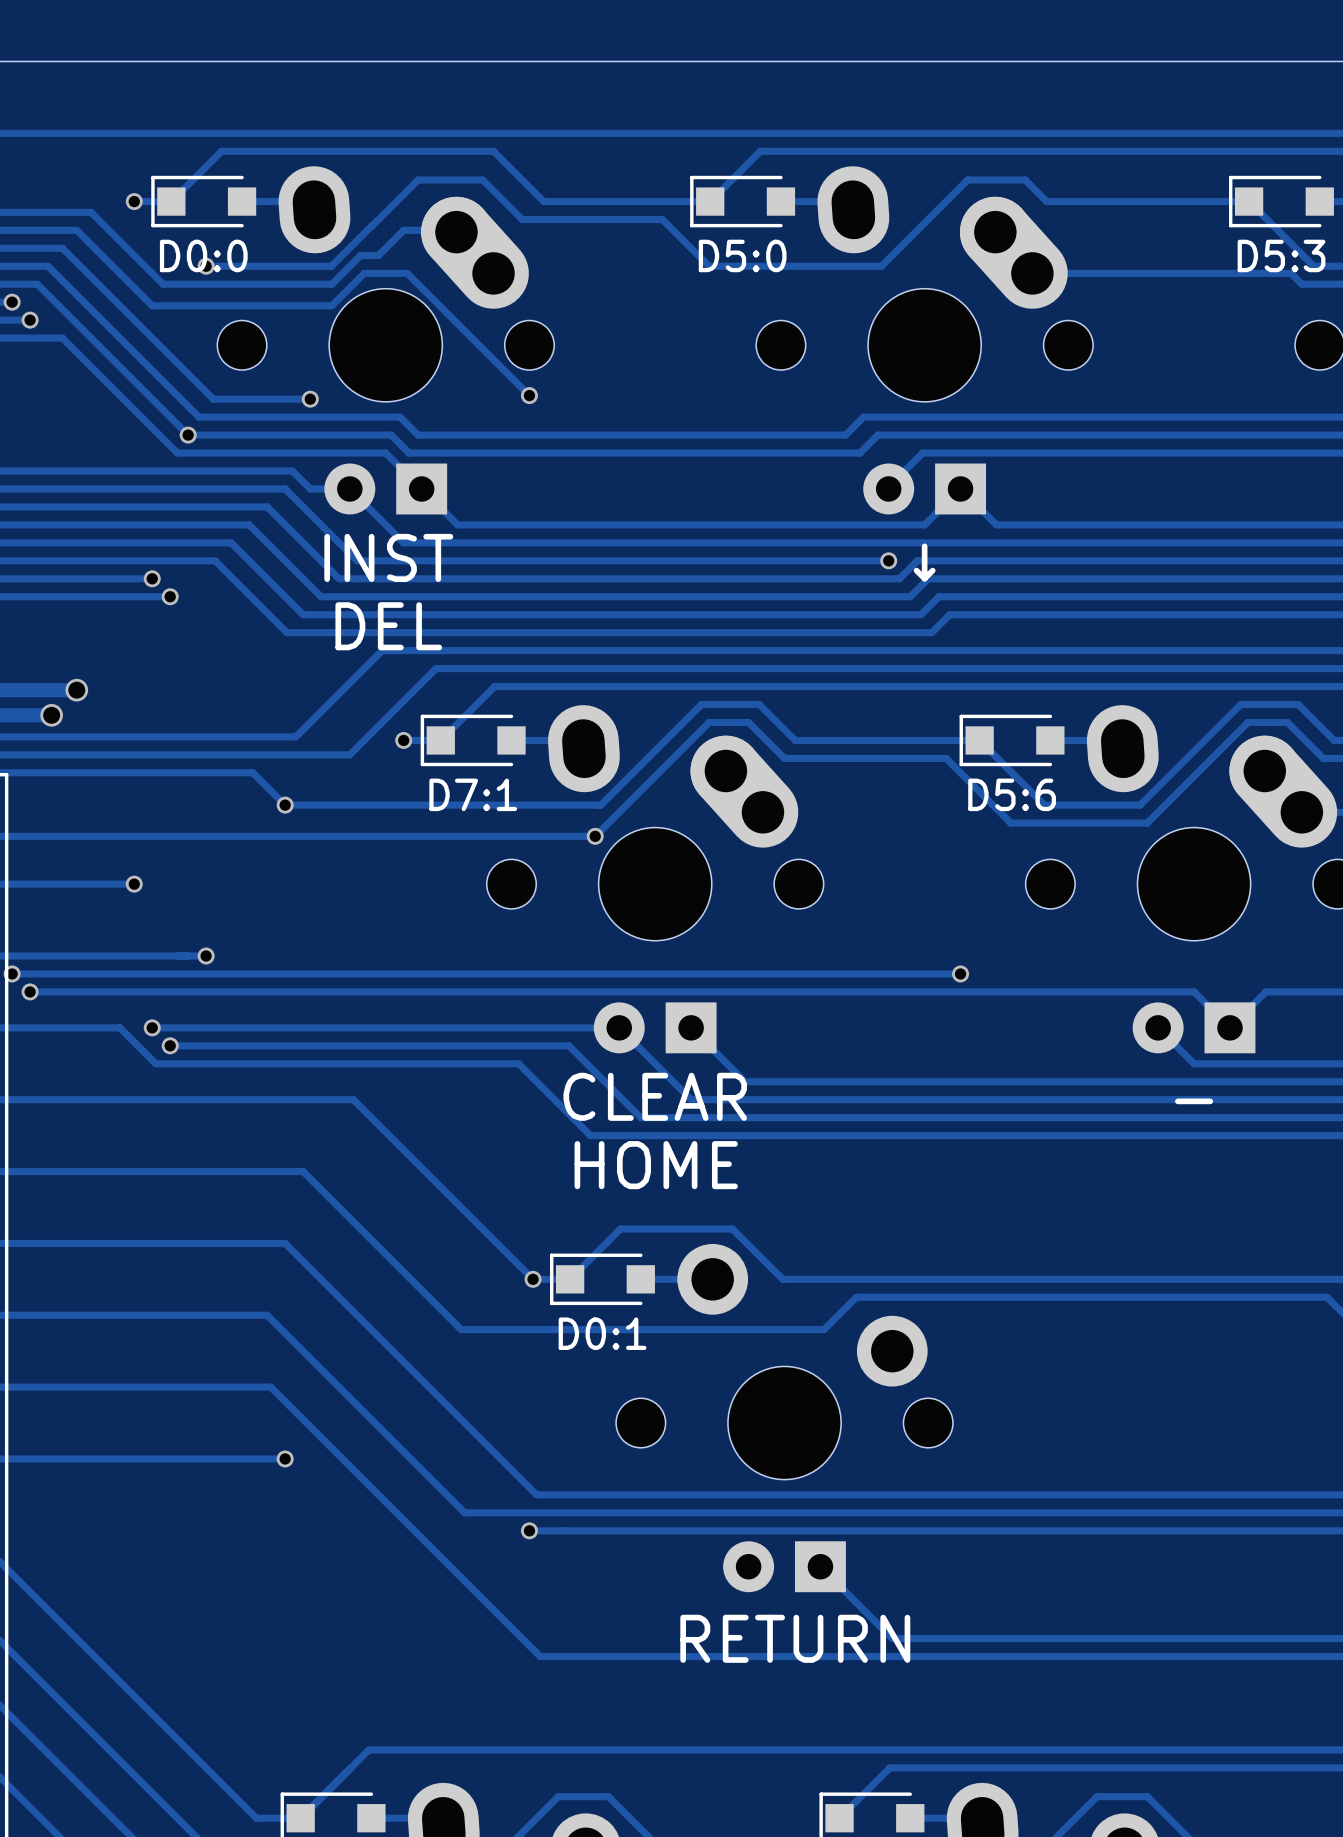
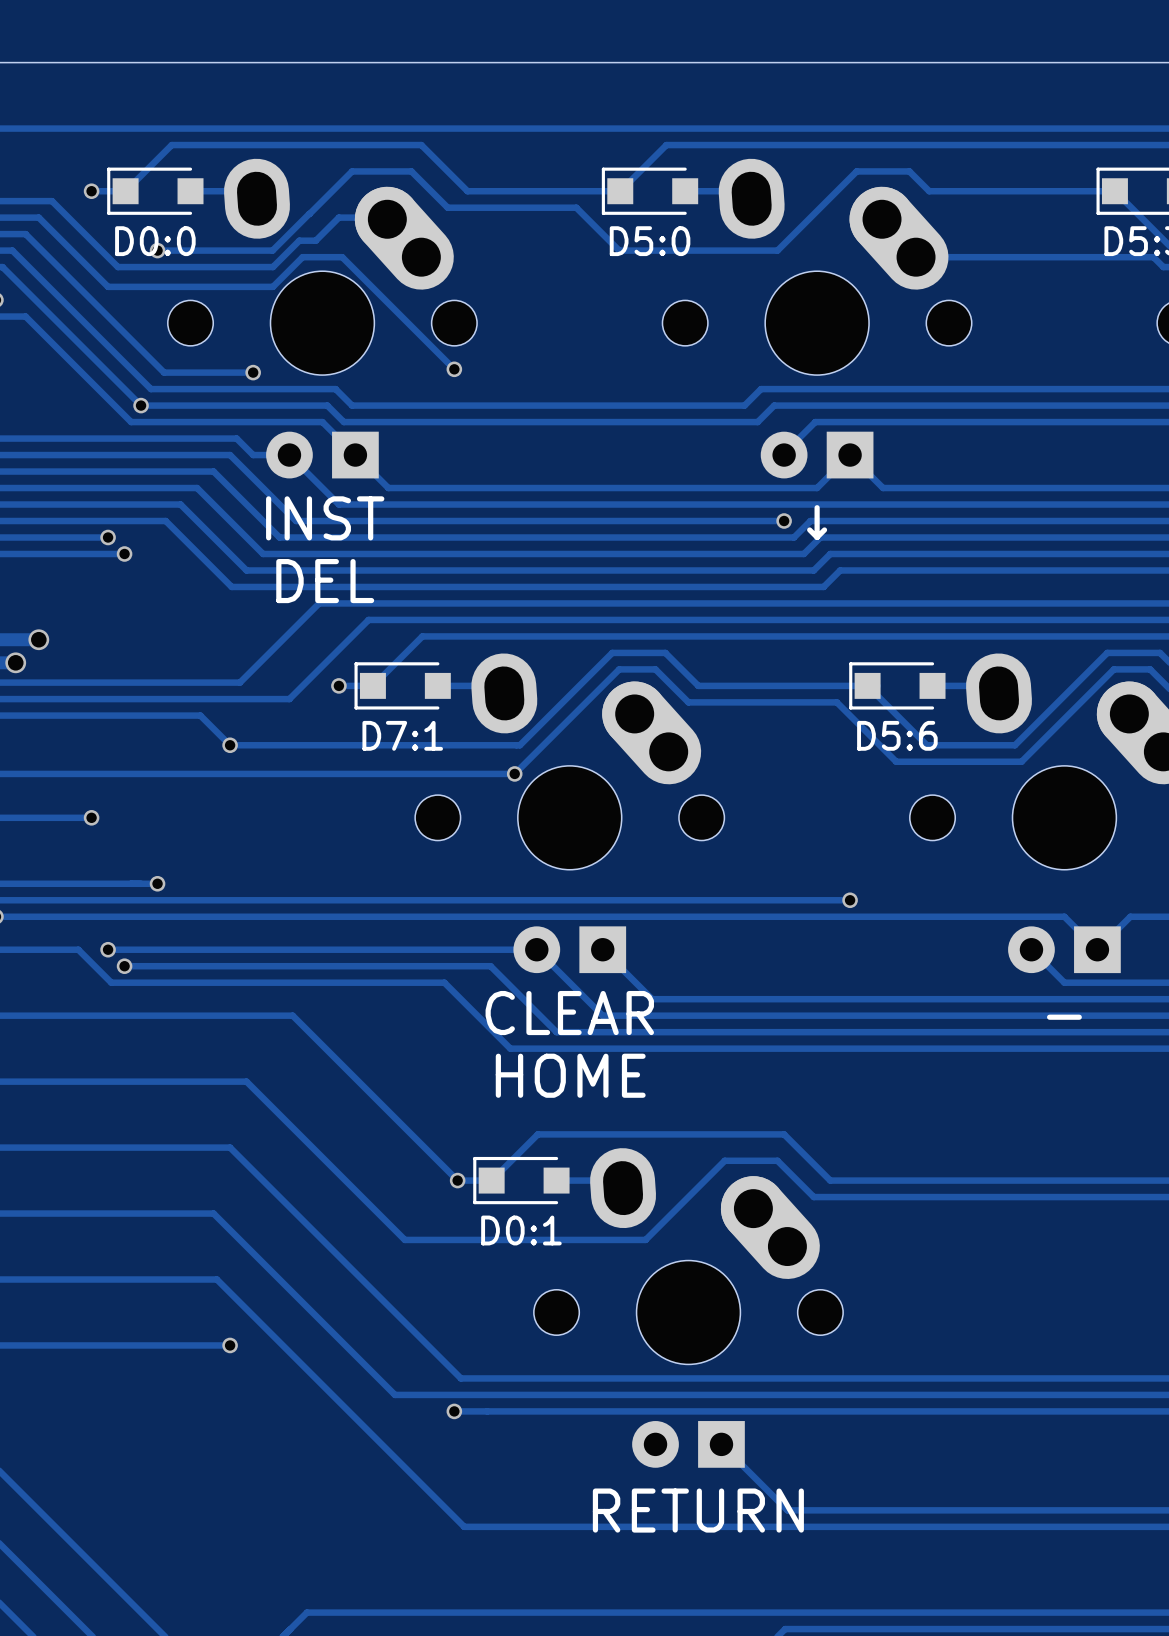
track: (732, 1229) (782, 1279) (939, 1279) -> (640, 1134) (784, 1134) (830, 1180)
part footprint: [616, 1243, 953, 1480] -> [533, 1148, 844, 1365]
track: (921, 1297) (856, 1297) (824, 1329) (461, 1329) -> (813, 1197) (777, 1160) (724, 1160) (645, 1239) (404, 1239) (391, 1226)

